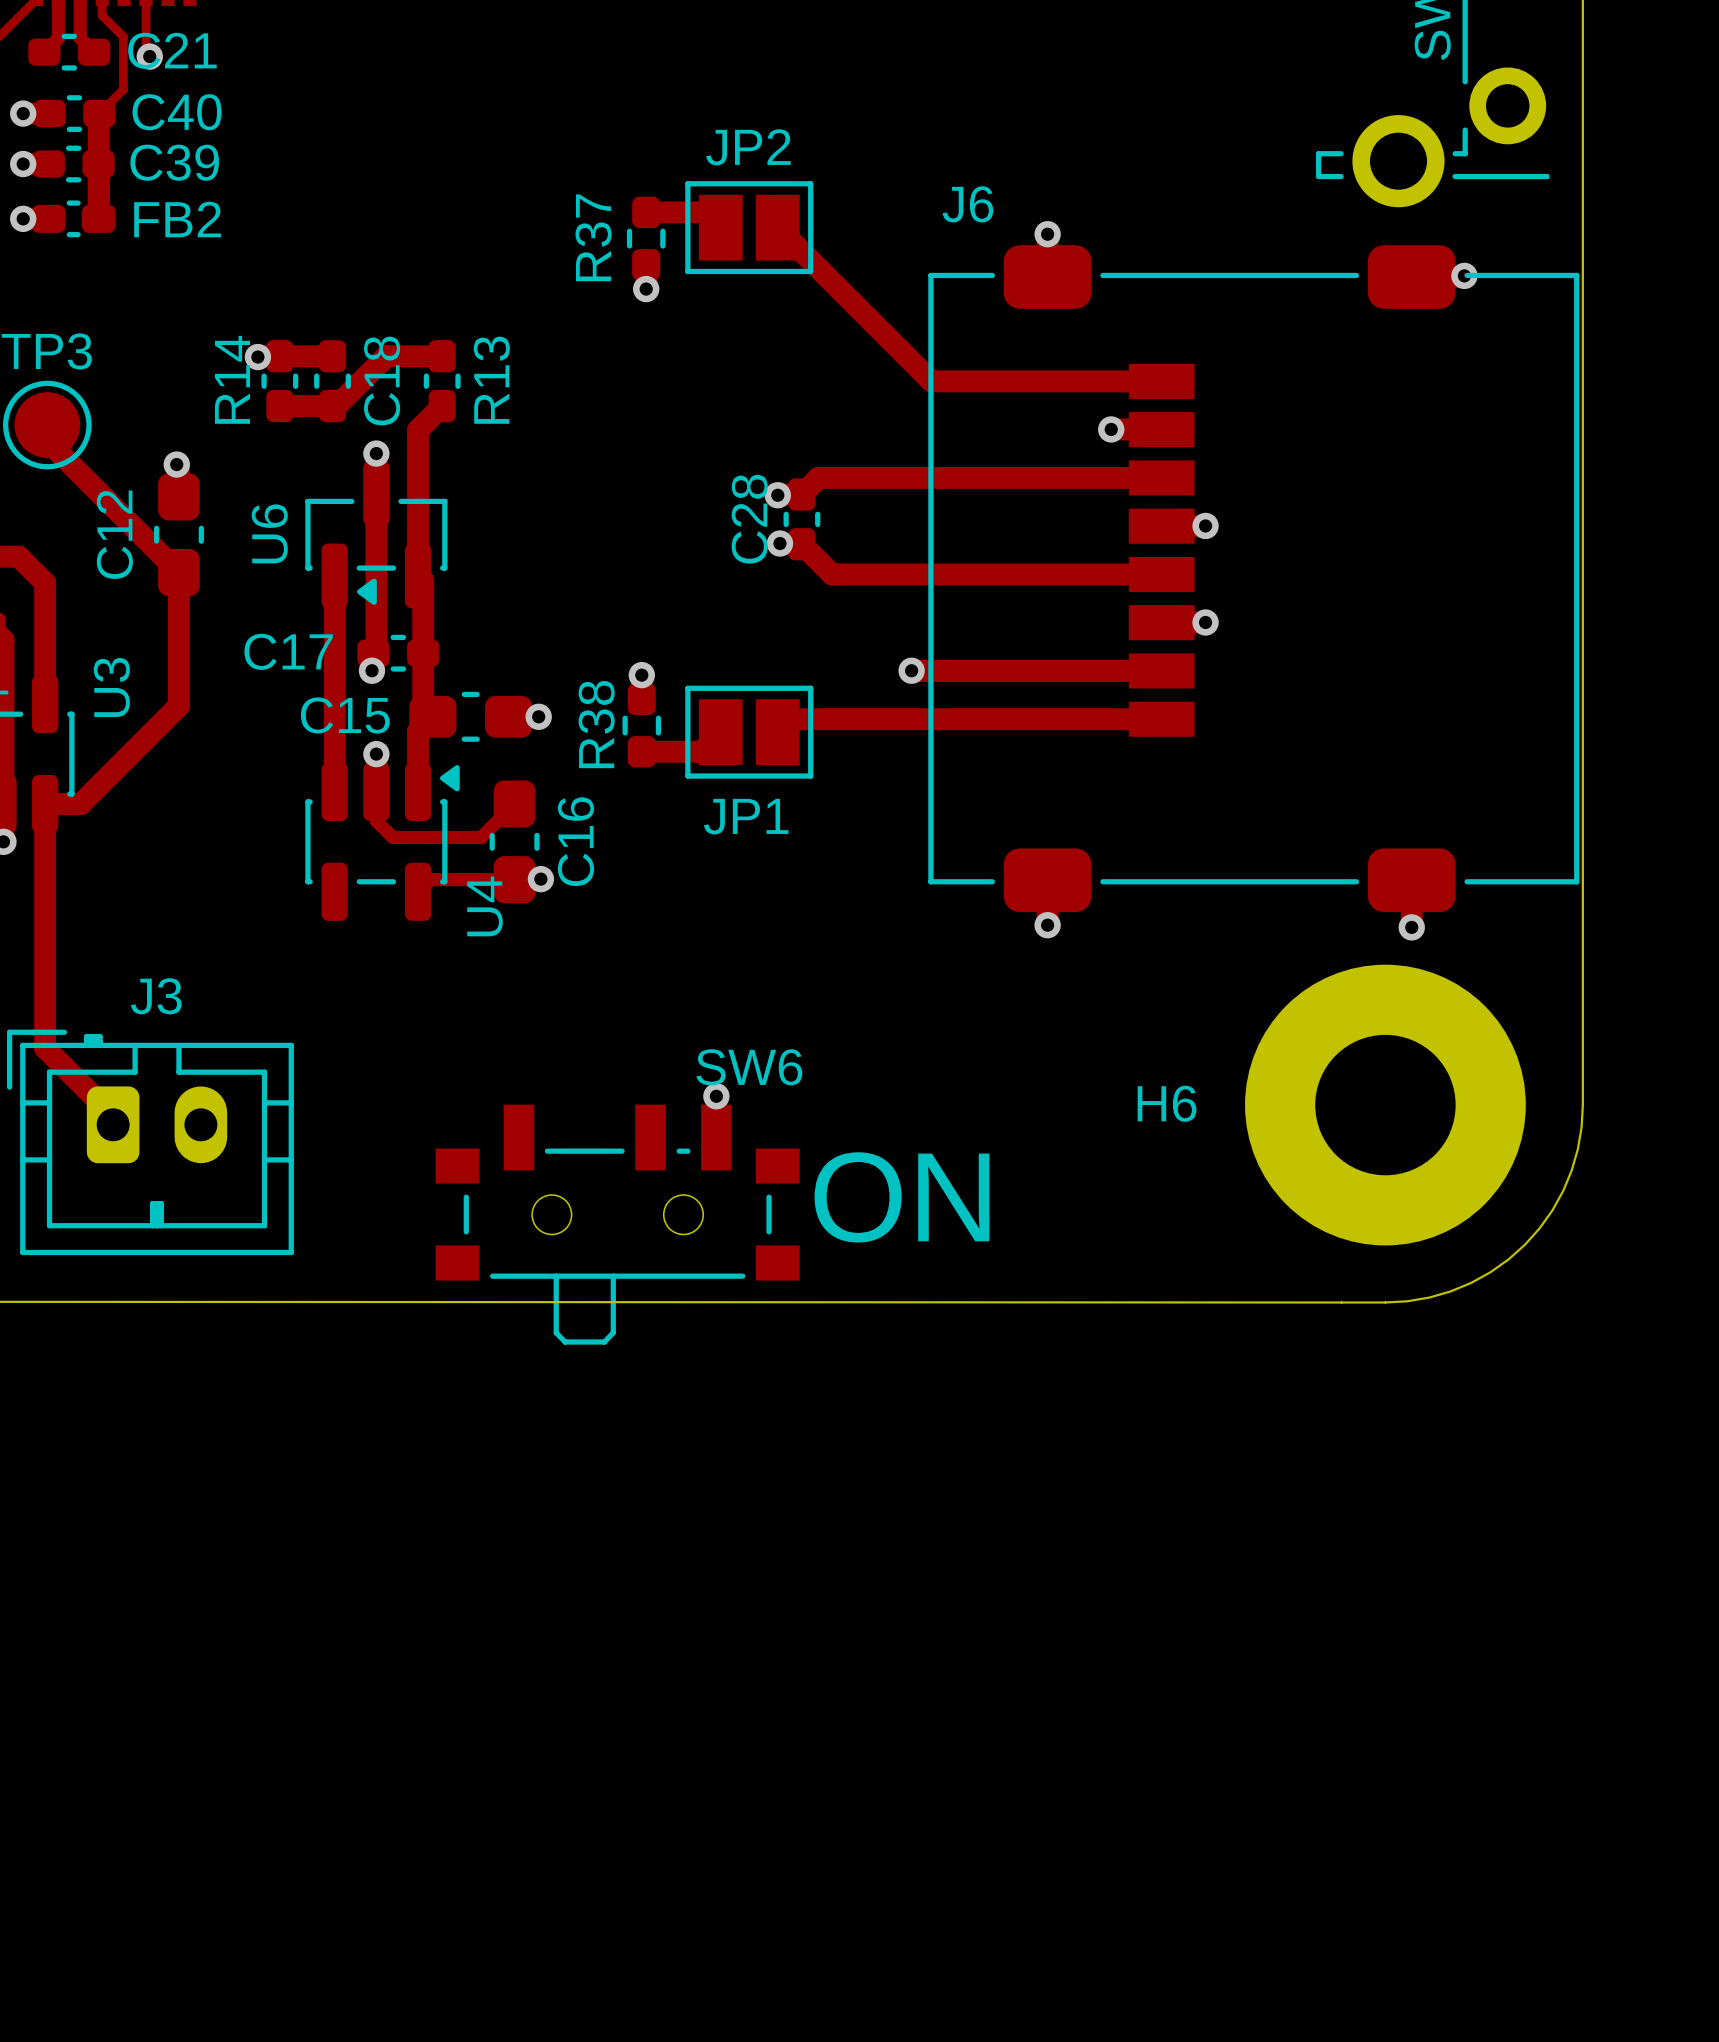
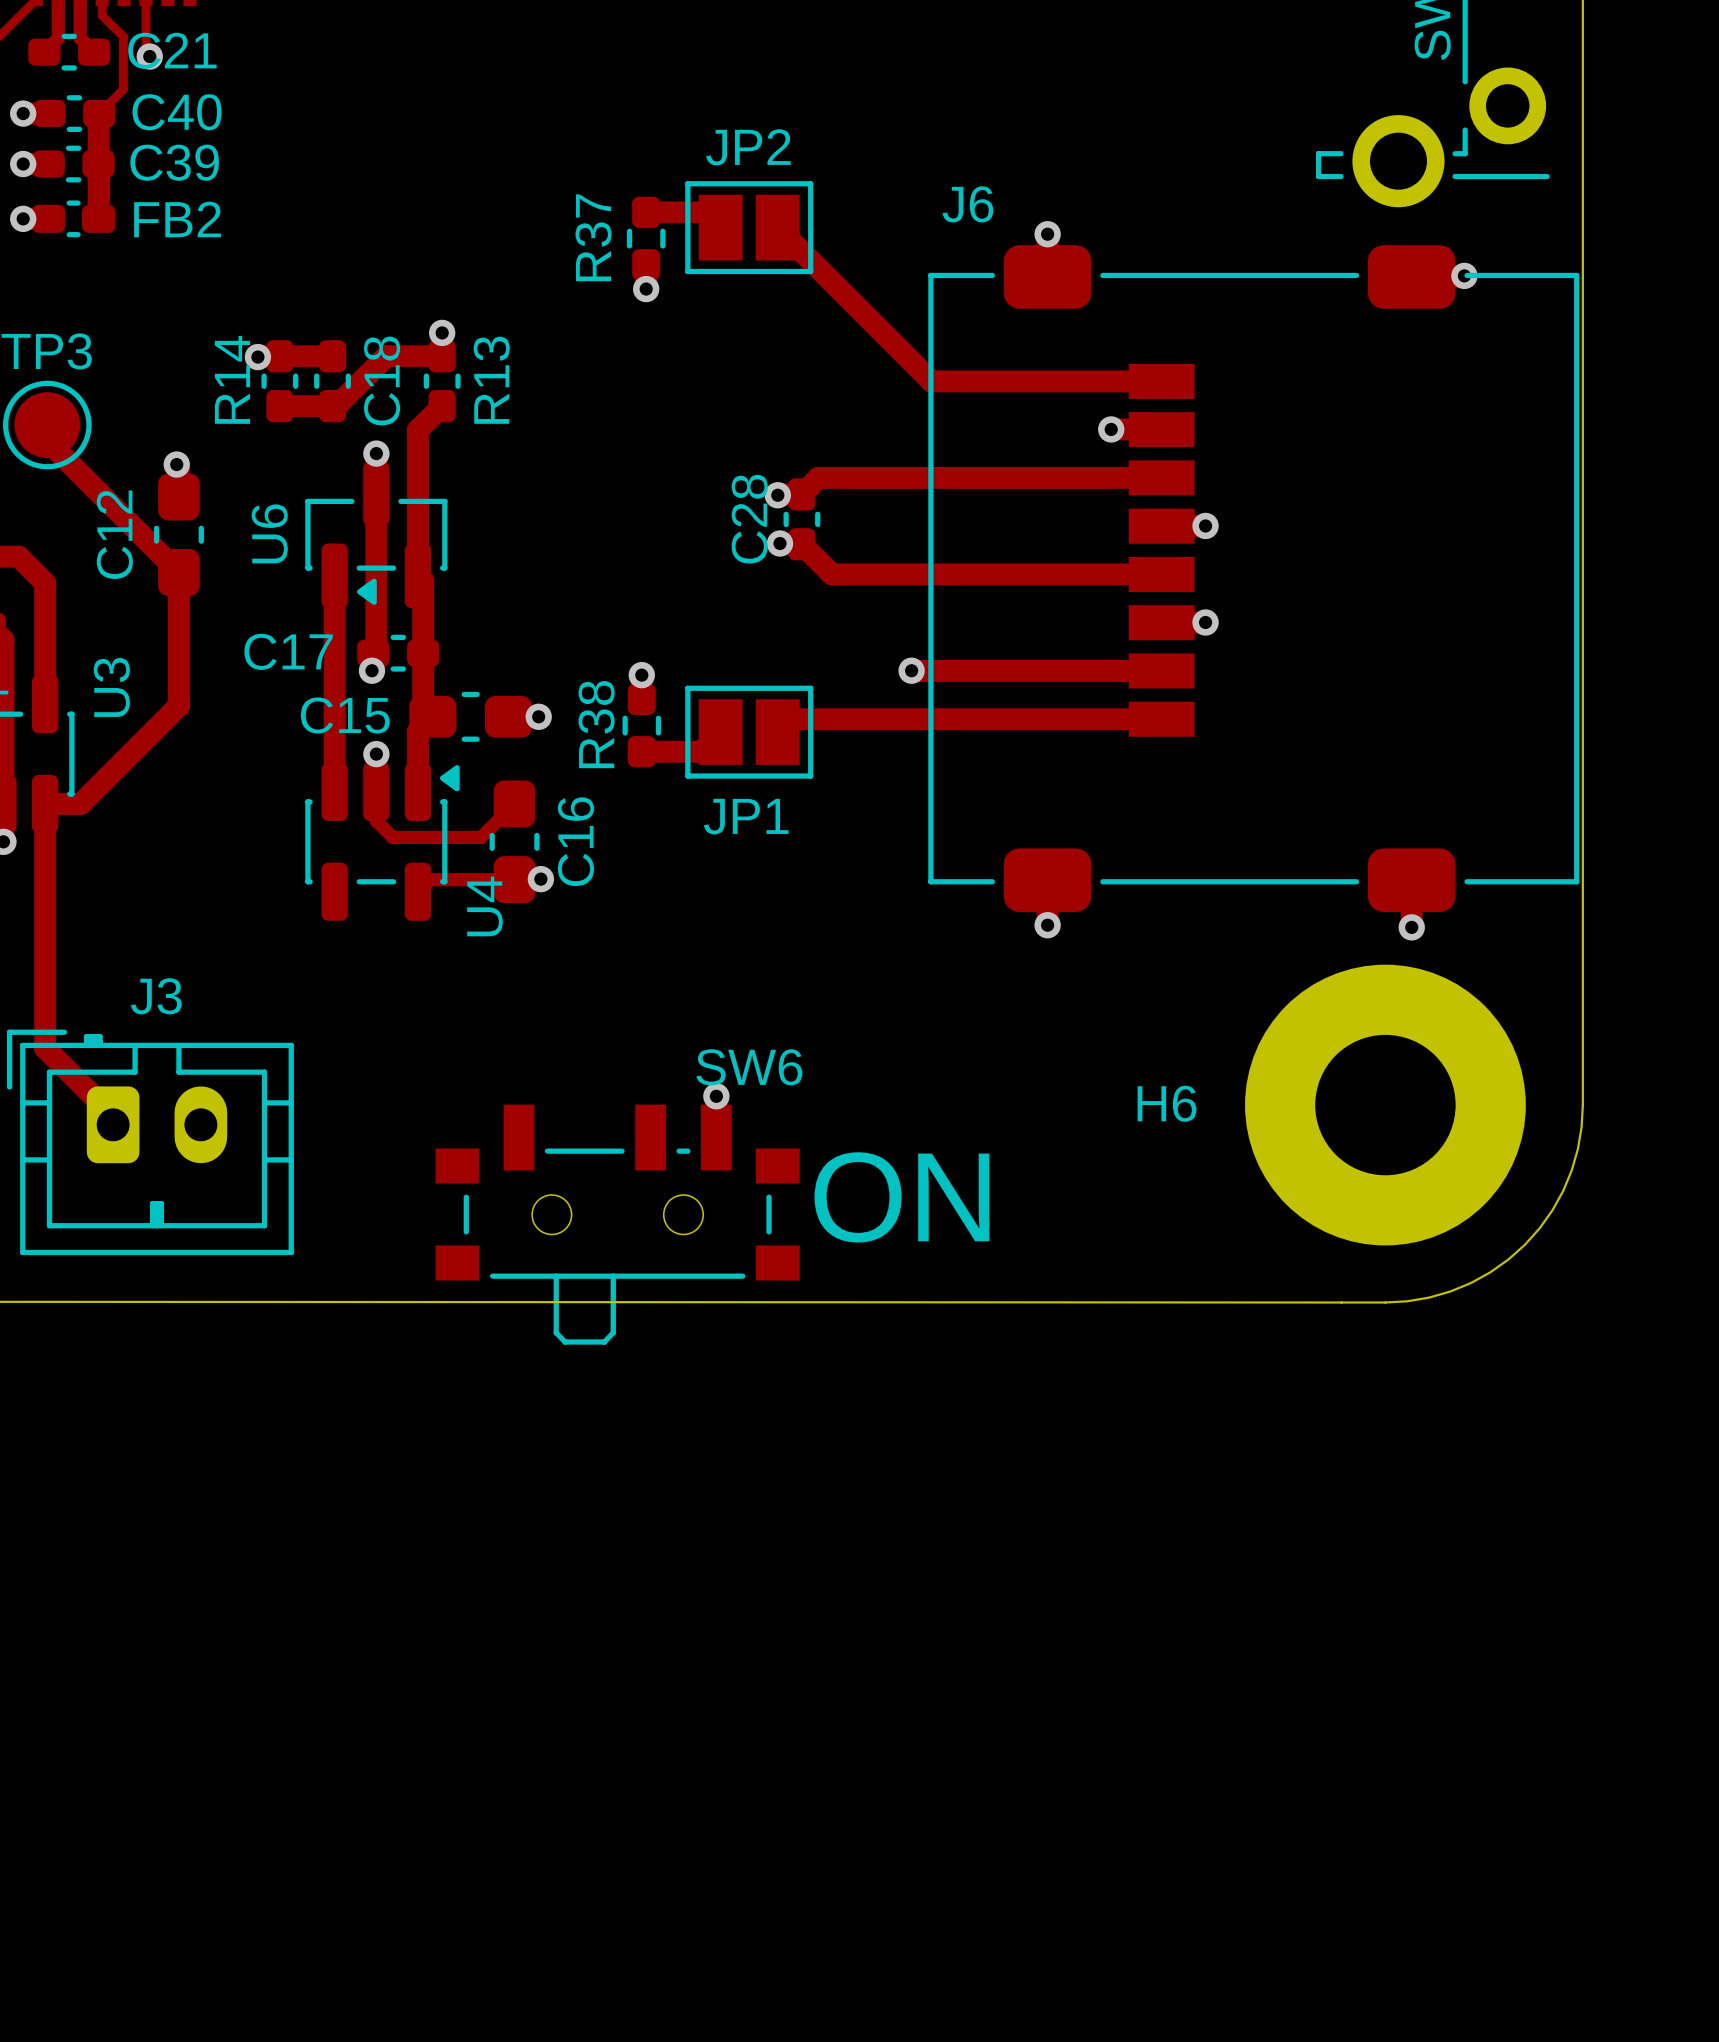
via: none -> (442, 332)

